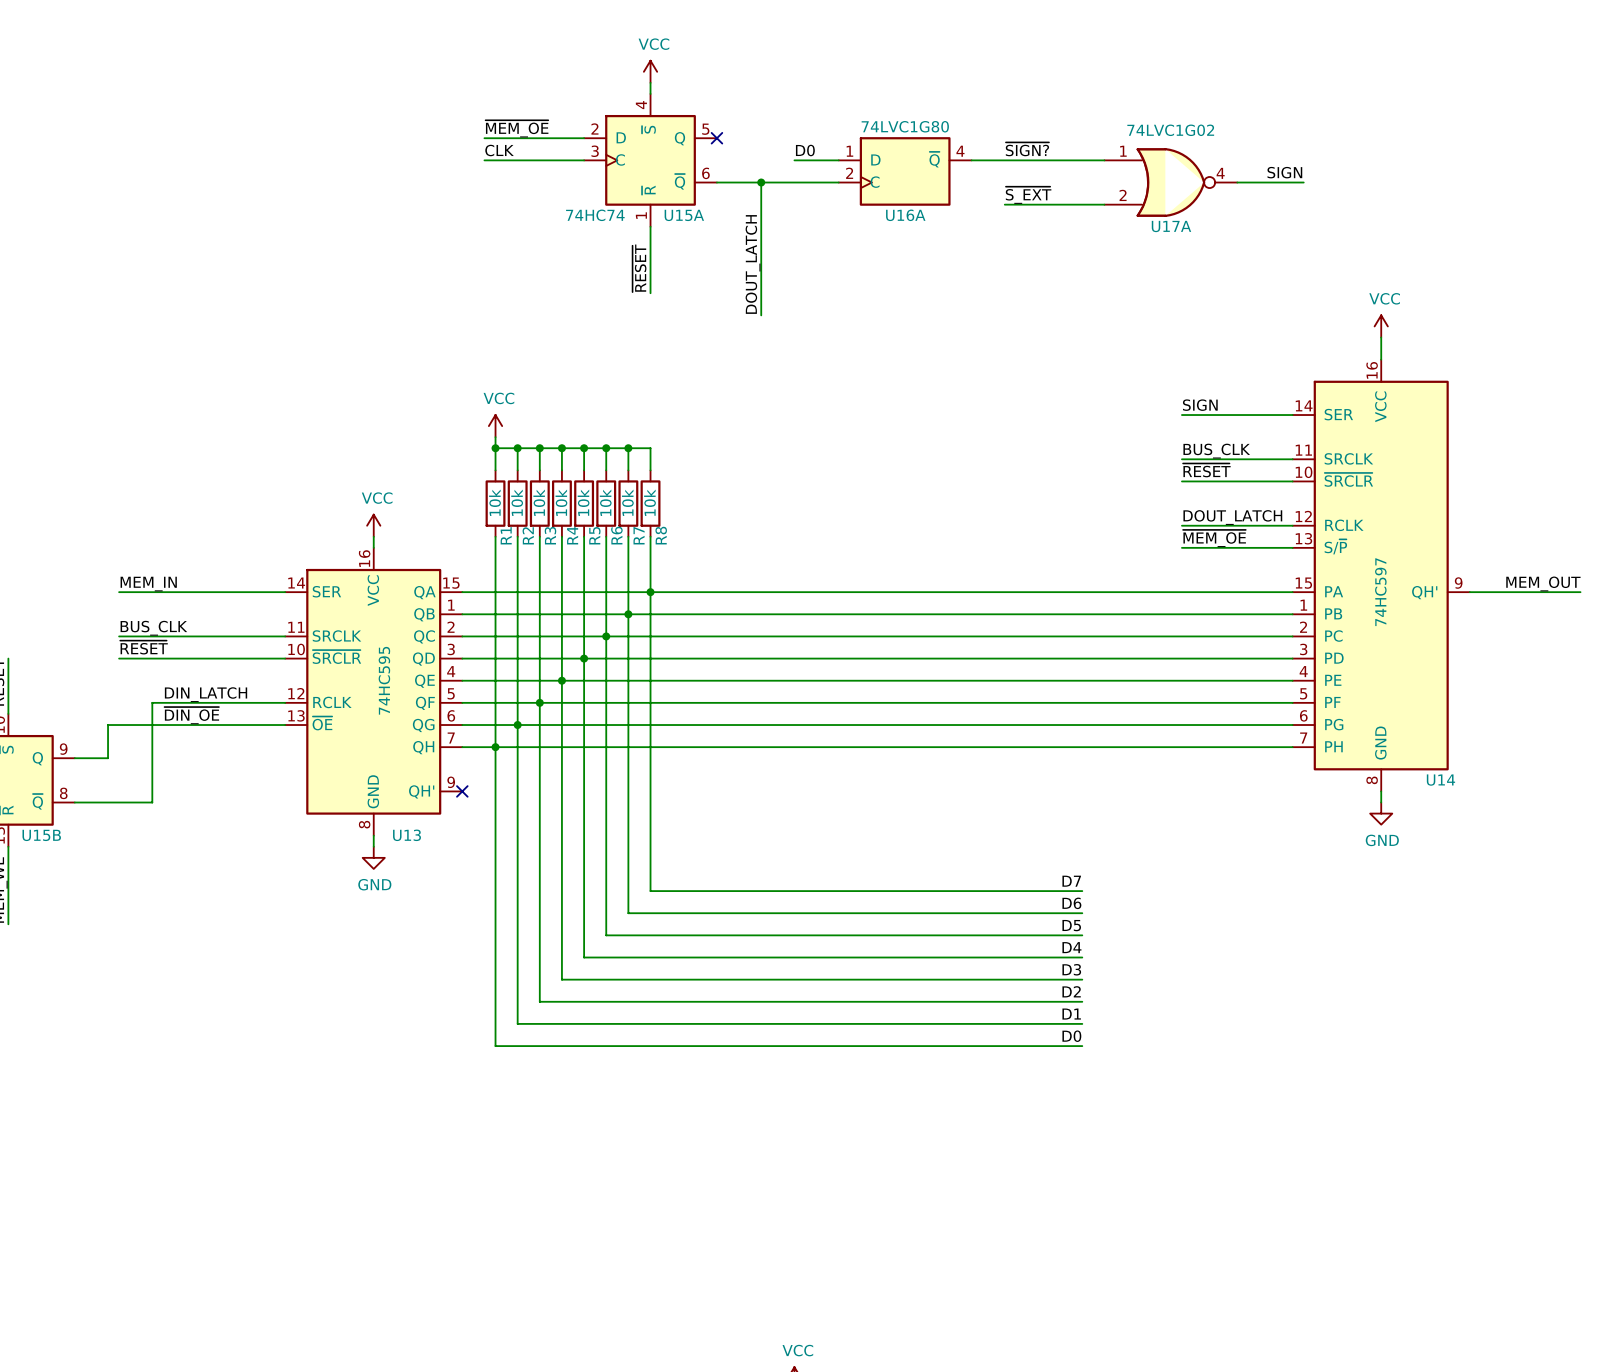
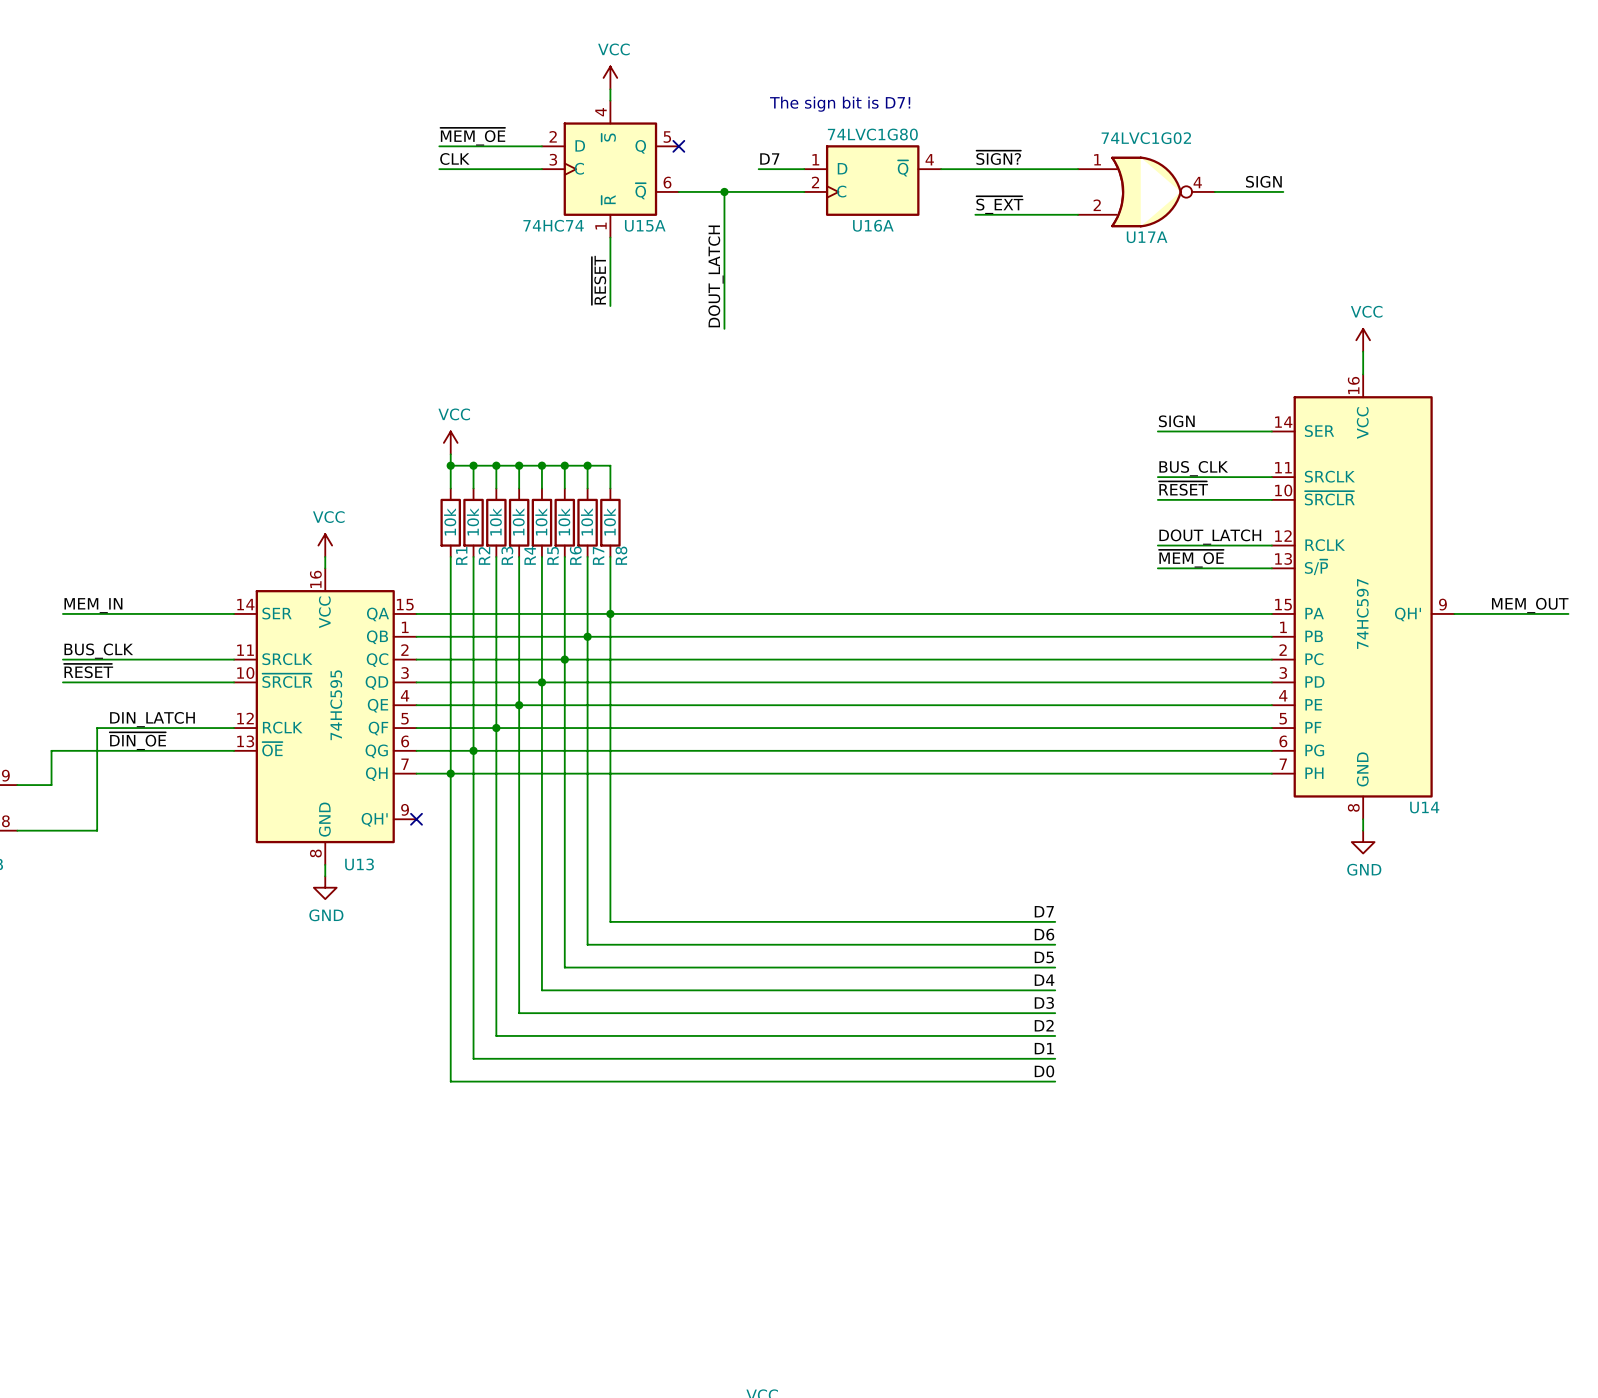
text: none -> The sign bit is D7! (840, 104)
label: D0 (805, 150) -> D7 (769, 158)

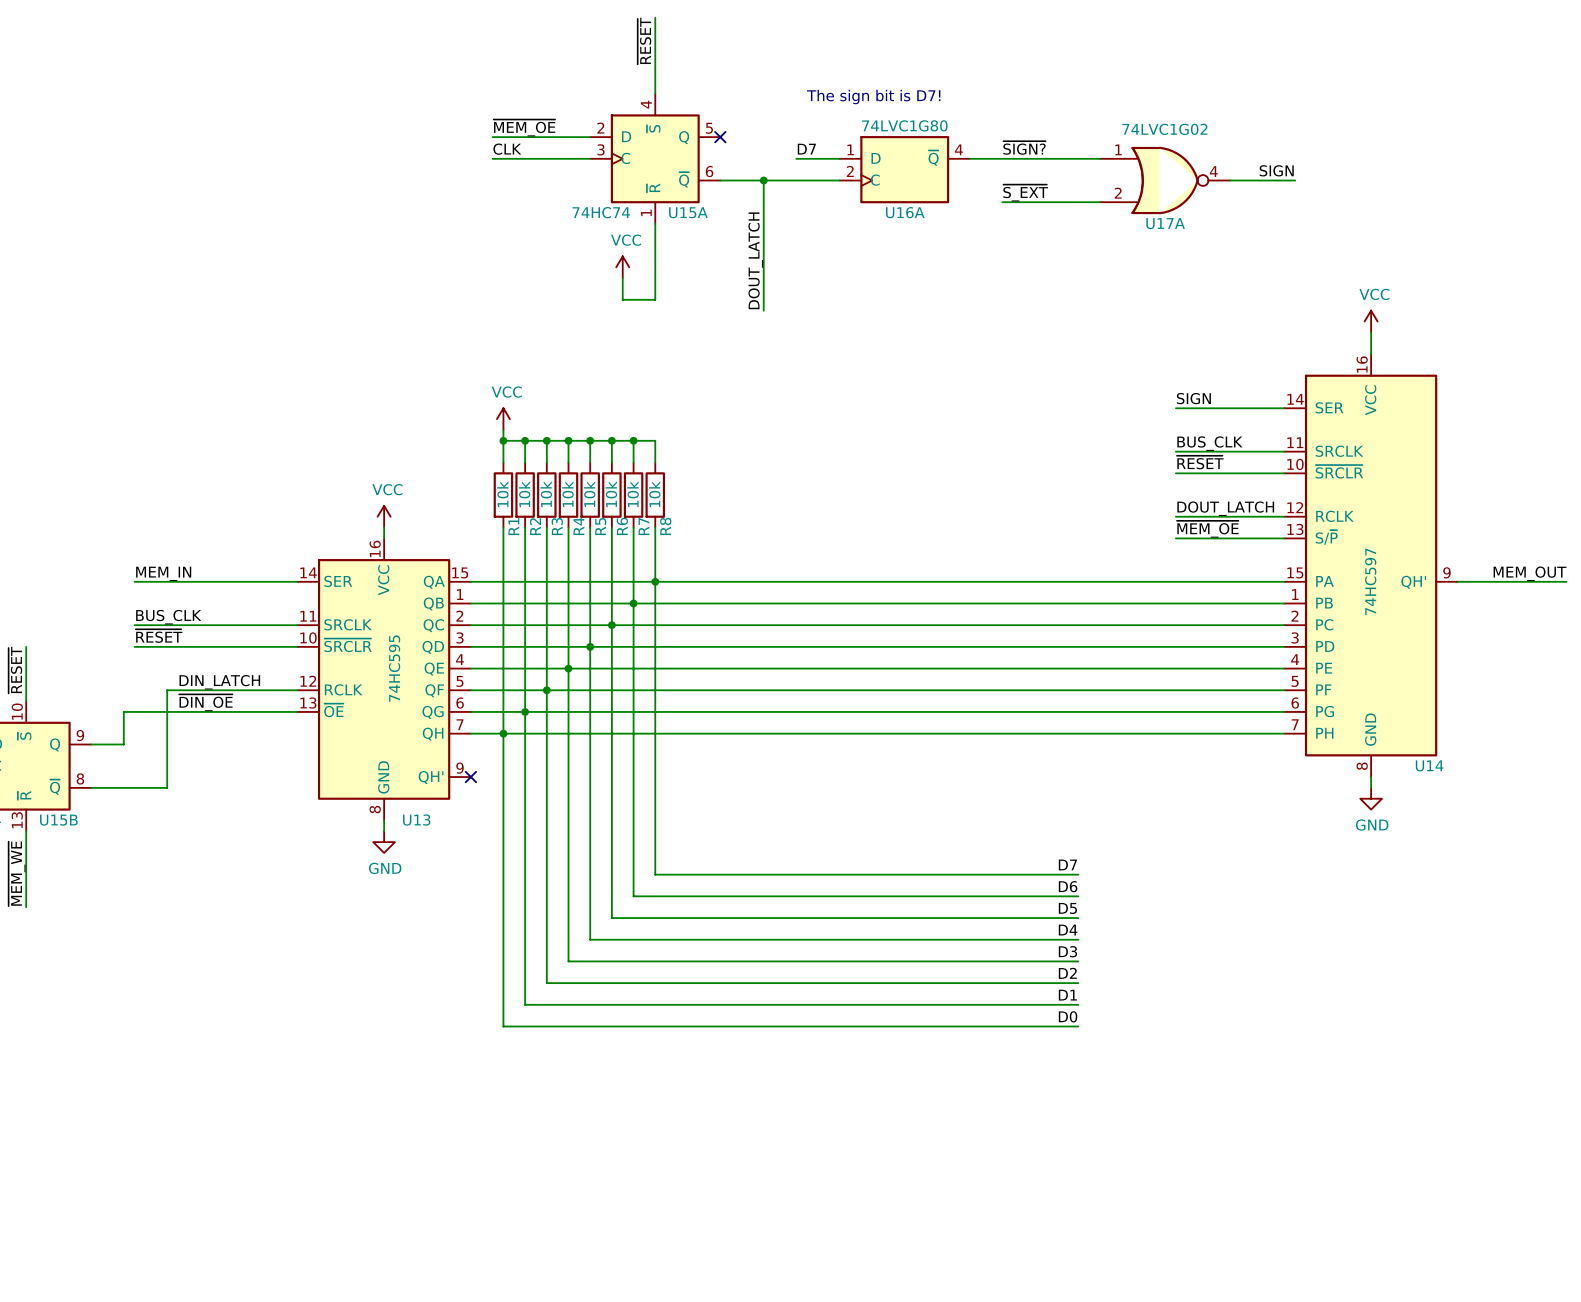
wire: none -> (655, 17) (655, 82)
label: none -> ~{RESET} (644, 41)
power symbol position: VCC (610, 77) -> VCC (622, 267)
label: ~{RESET} (599, 280) -> none
wire: none -> (622, 278) (622, 299) (655, 299) (655, 288)

